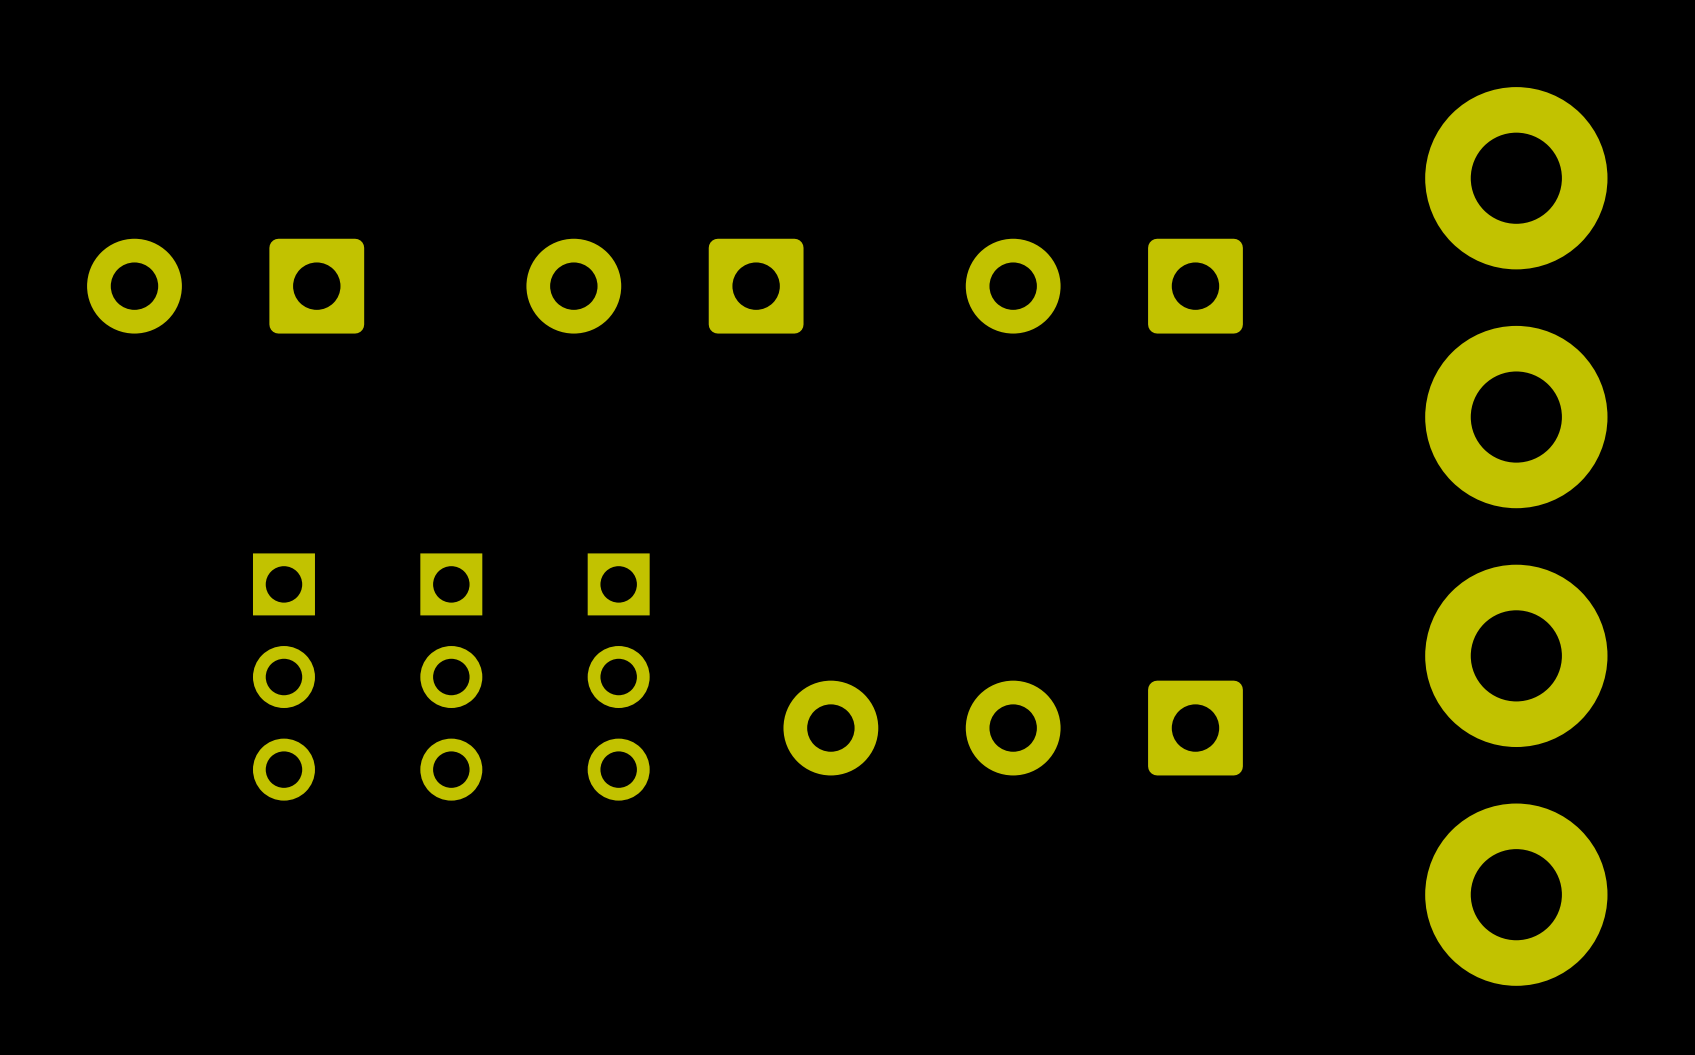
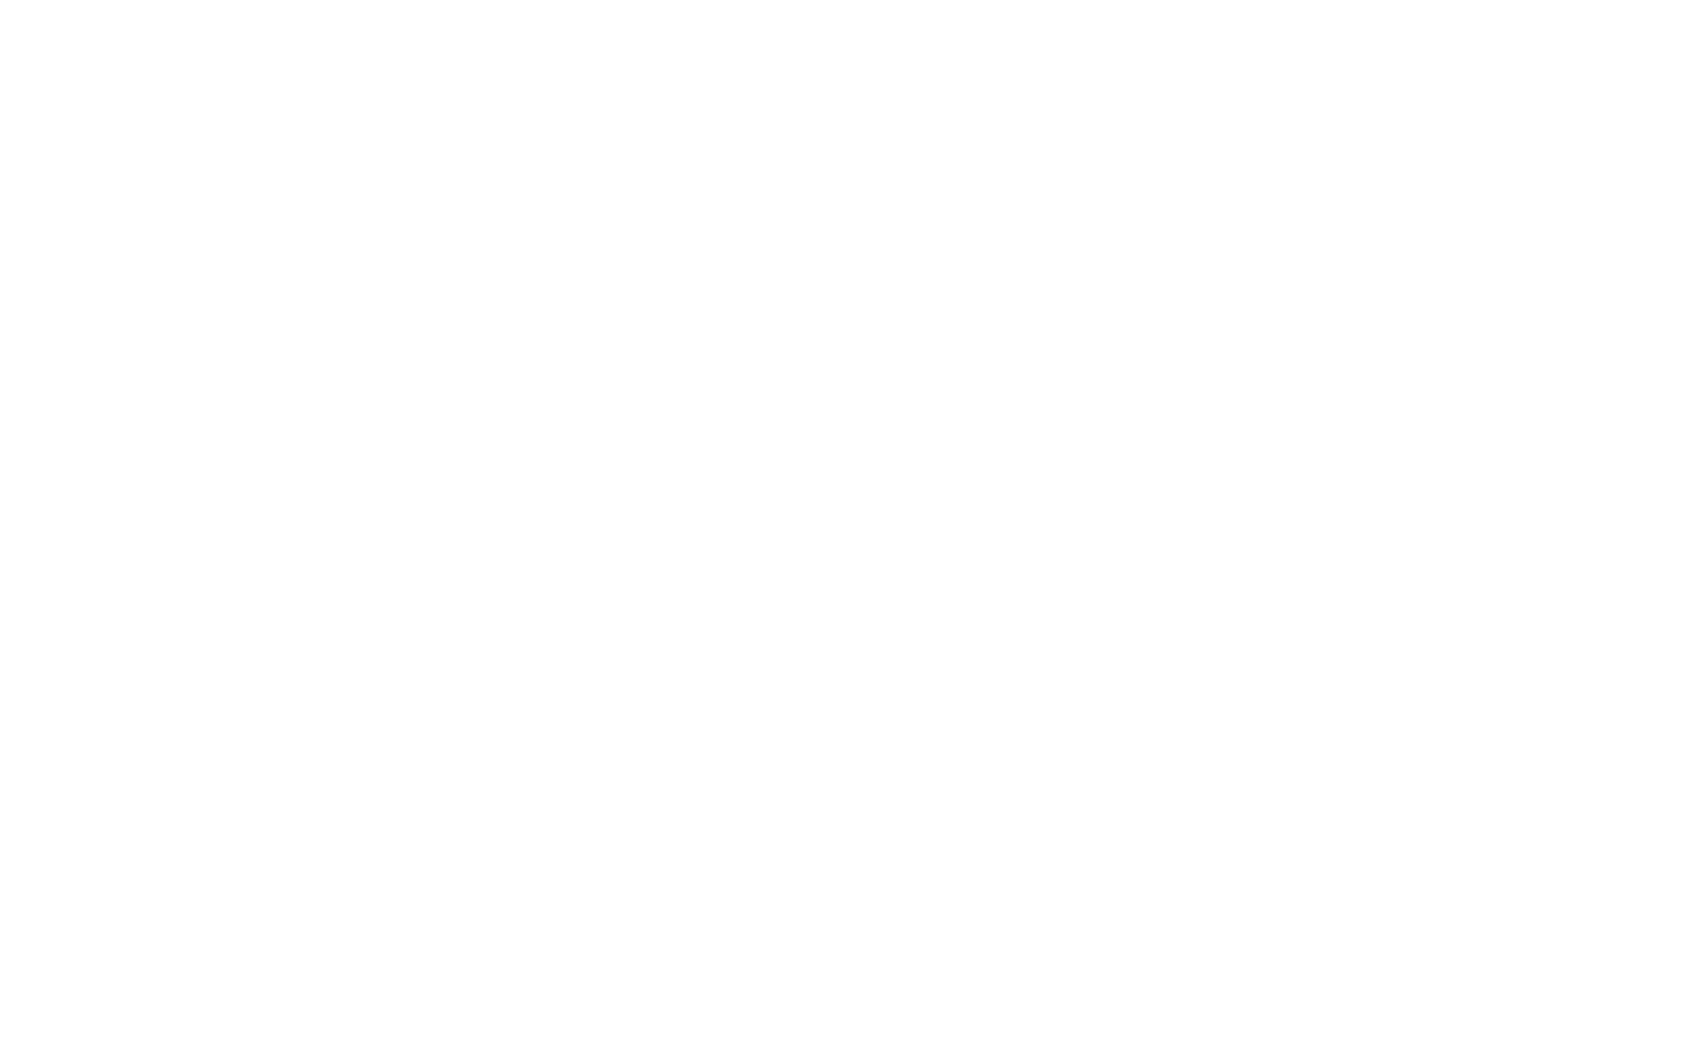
part: (1516, 178) -> none
part: (225, 286) -> none
part: (664, 286) -> none
part: (1104, 286) -> none
part: (1516, 417) -> none
part: (1516, 655) -> none
part: (283, 677) -> none
part: (451, 677) -> none
part: (618, 677) -> none
part: (1013, 728) -> none
part: (1516, 894) -> none

